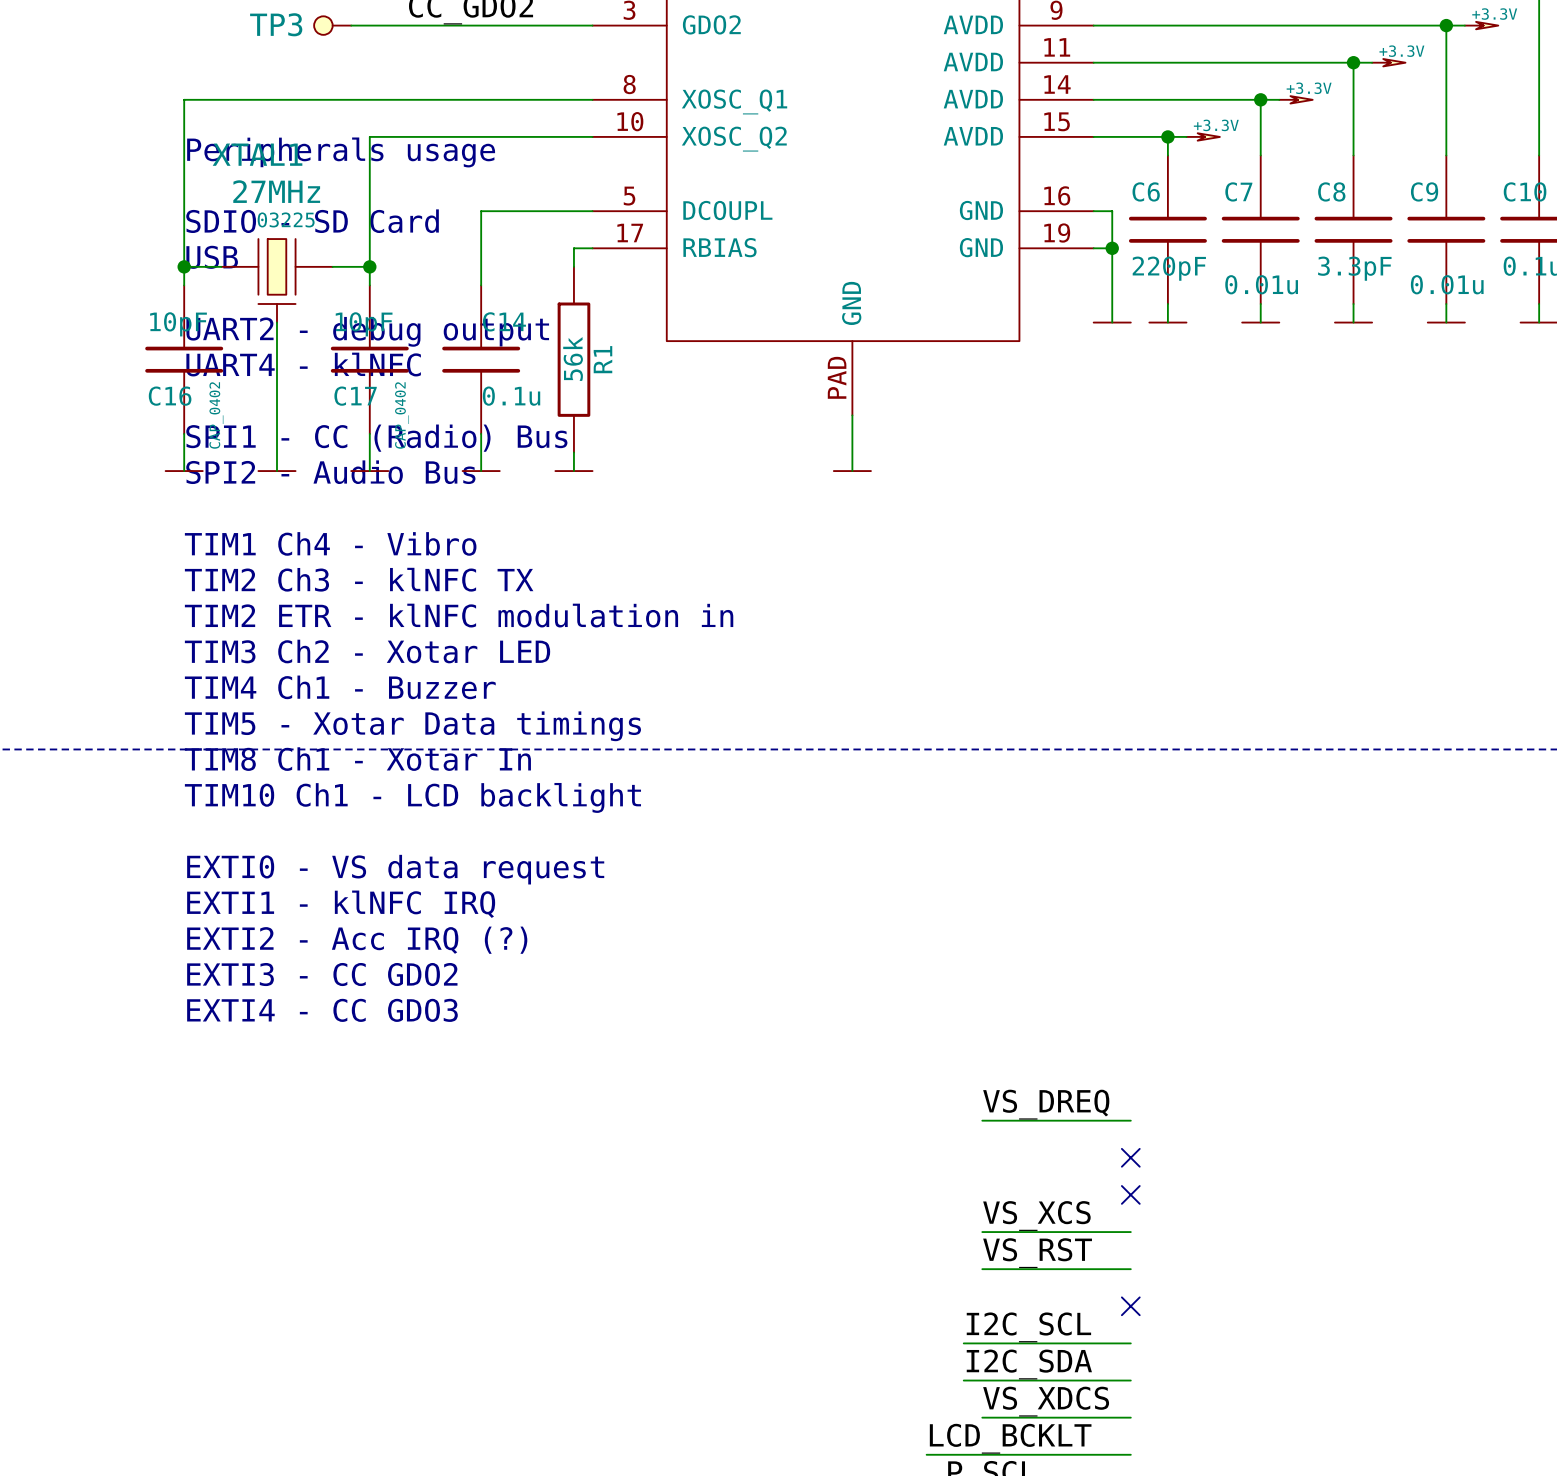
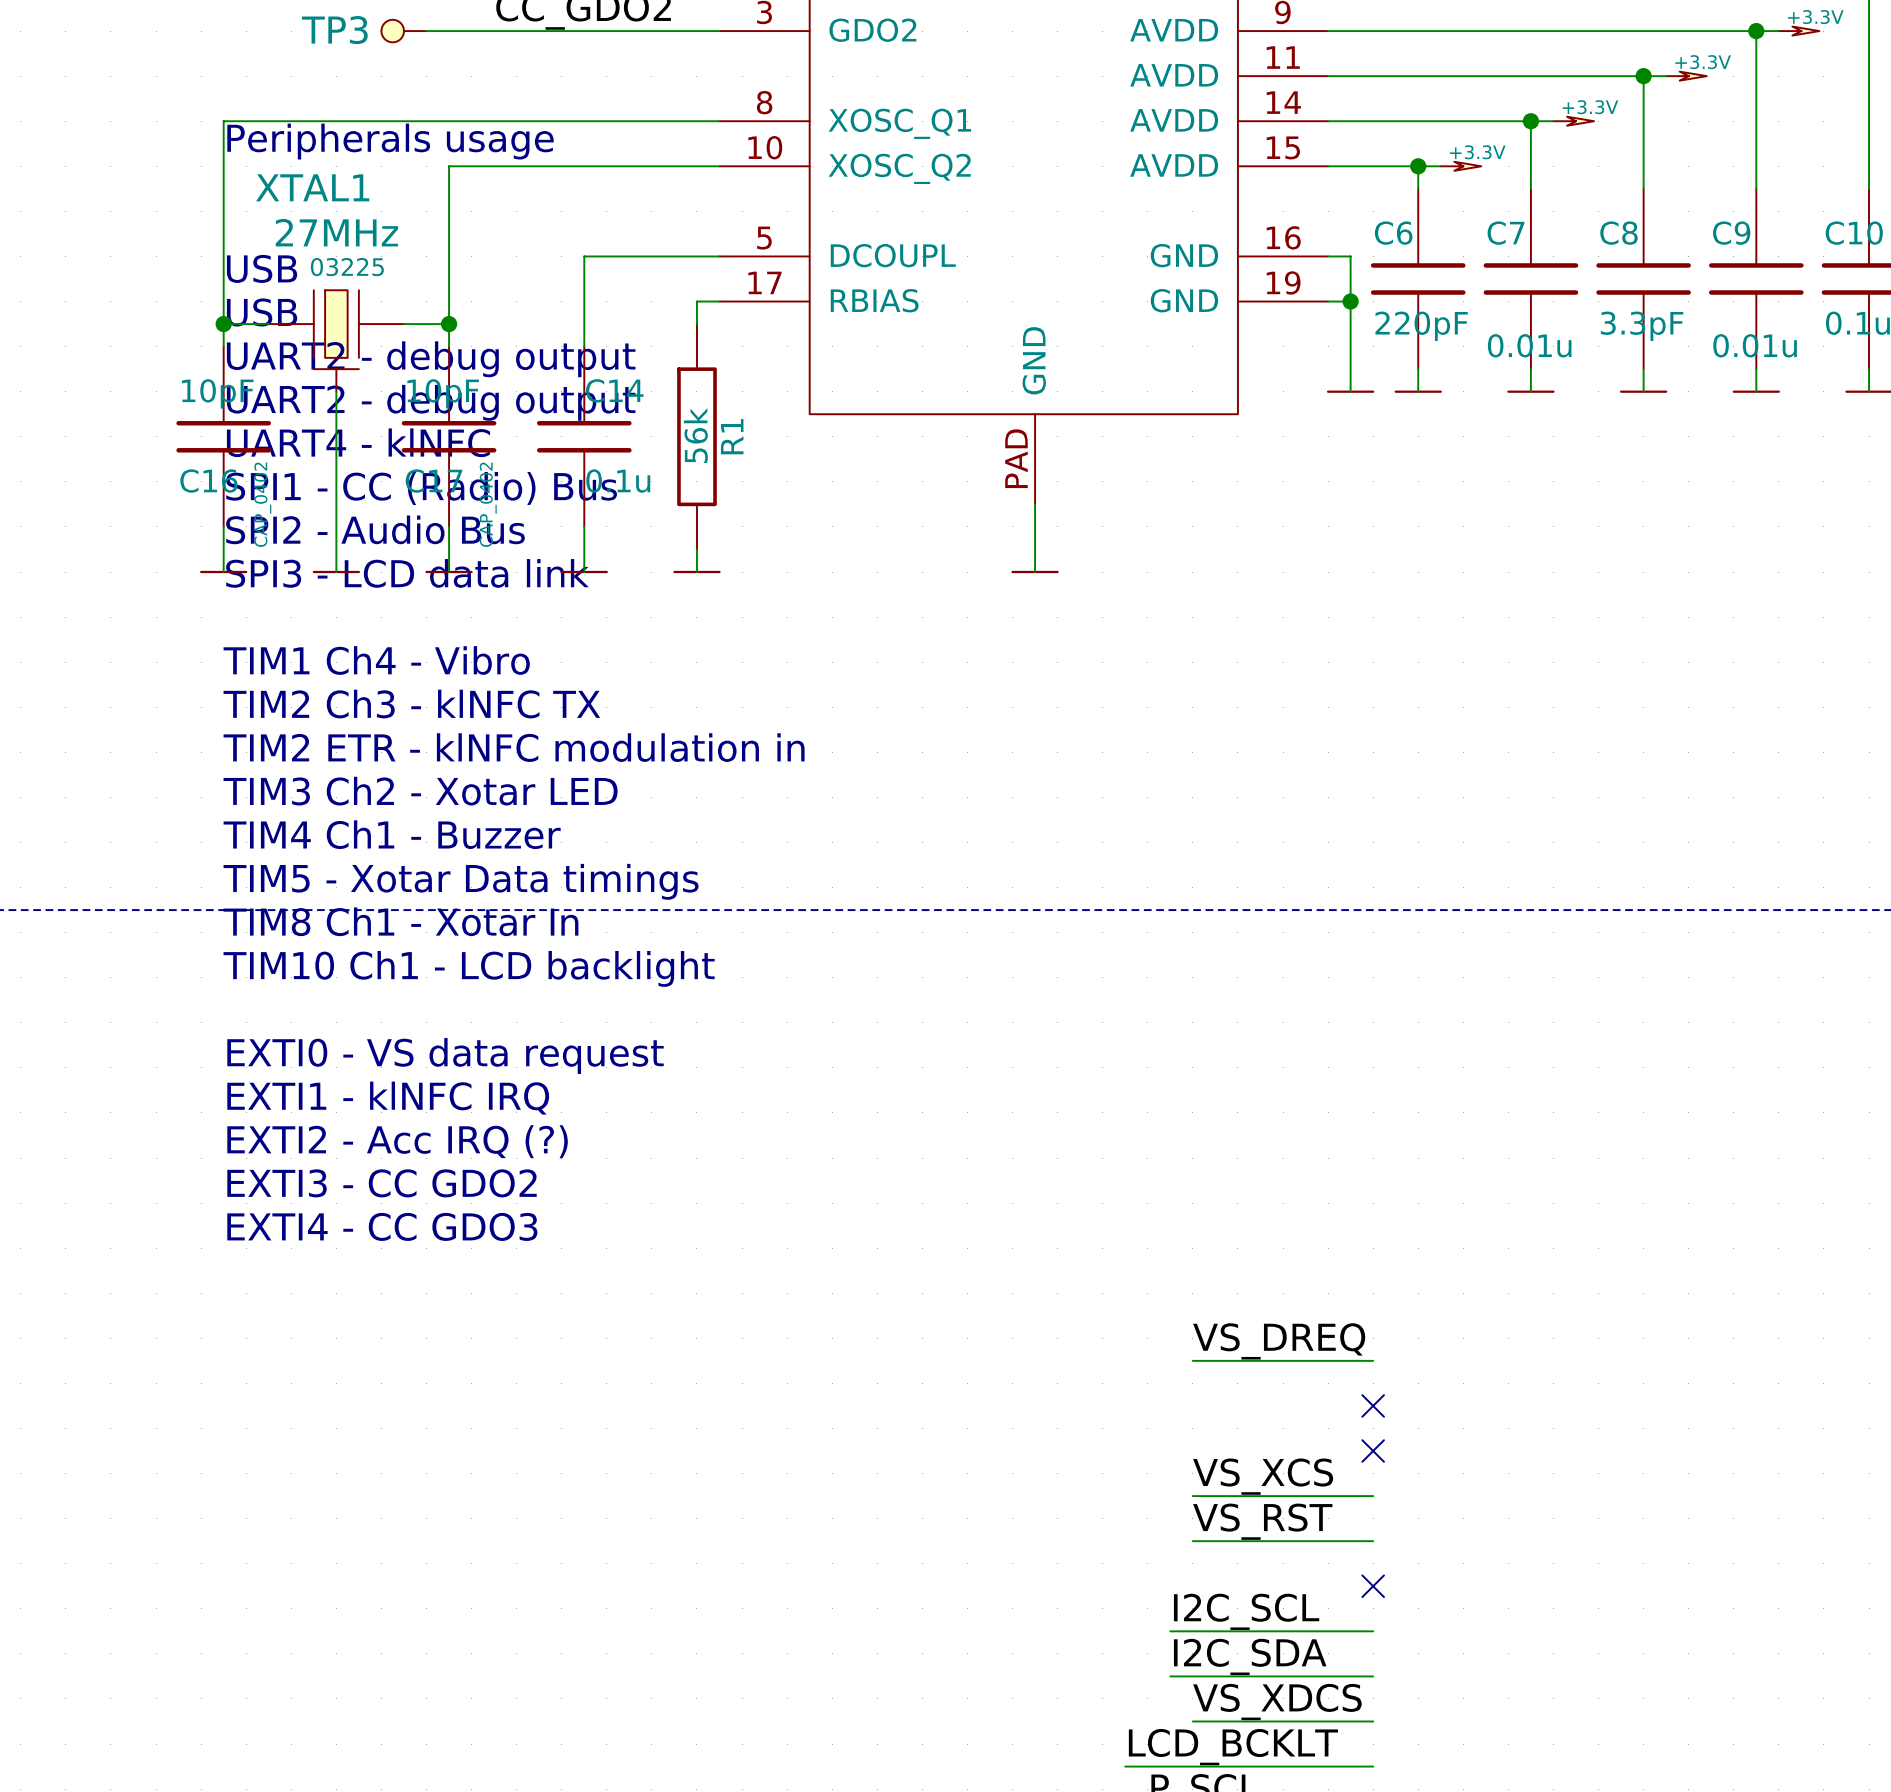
text position: Peripherals usage (341, 152) -> Peripherals usage (390, 141)
text: SDIO - SD Card (312, 221) -> USB (262, 268)
text: none -> UART2 - debug output (431, 359)
text: none -> SPI1 - CC (Radio) Bus (421, 488)
text: SPI1 - CC (Radio) Bus (376, 438) -> SPI2 - Audio Bus (375, 529)
text: SPI2 - Audio Bus (330, 472) -> SPI3 - LCD data link (407, 573)

